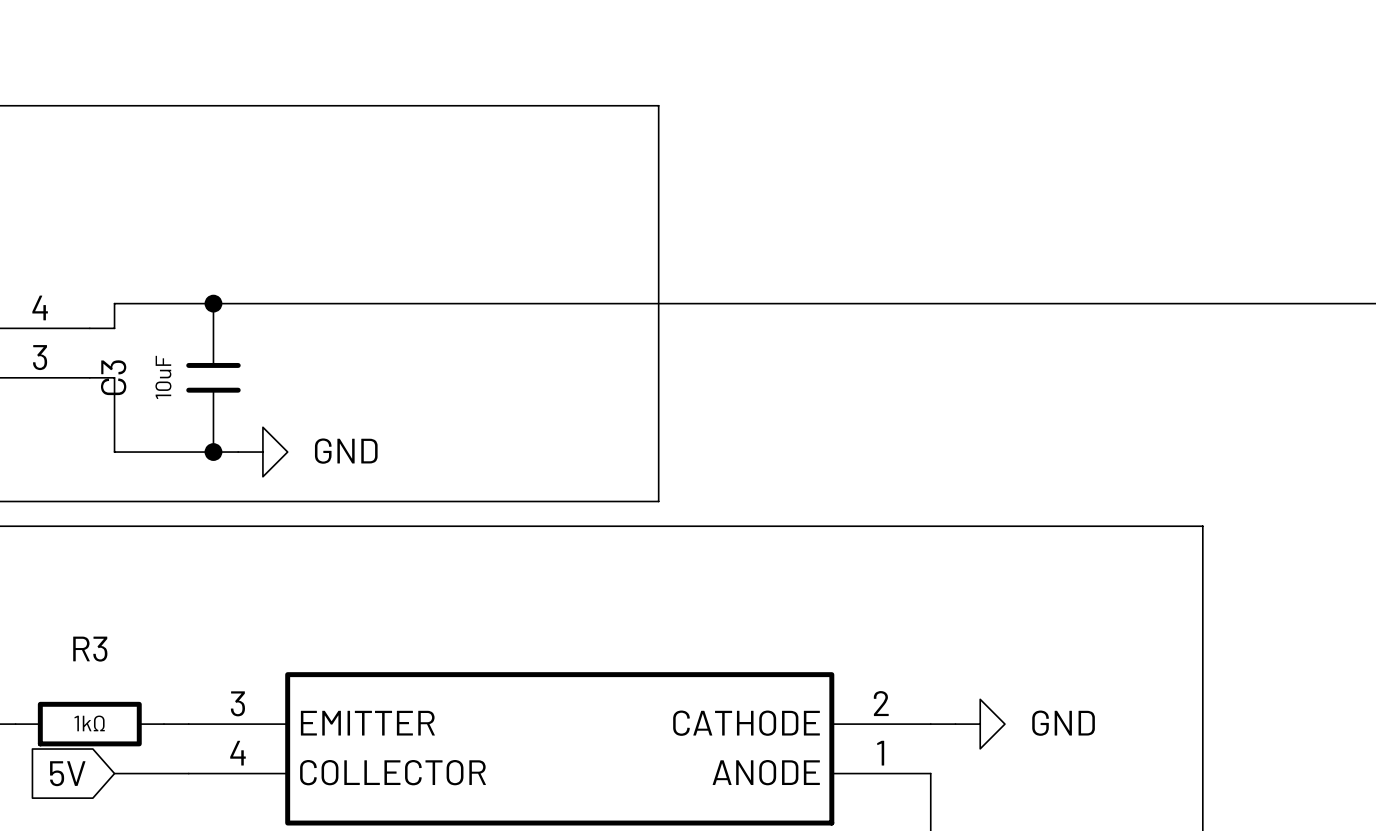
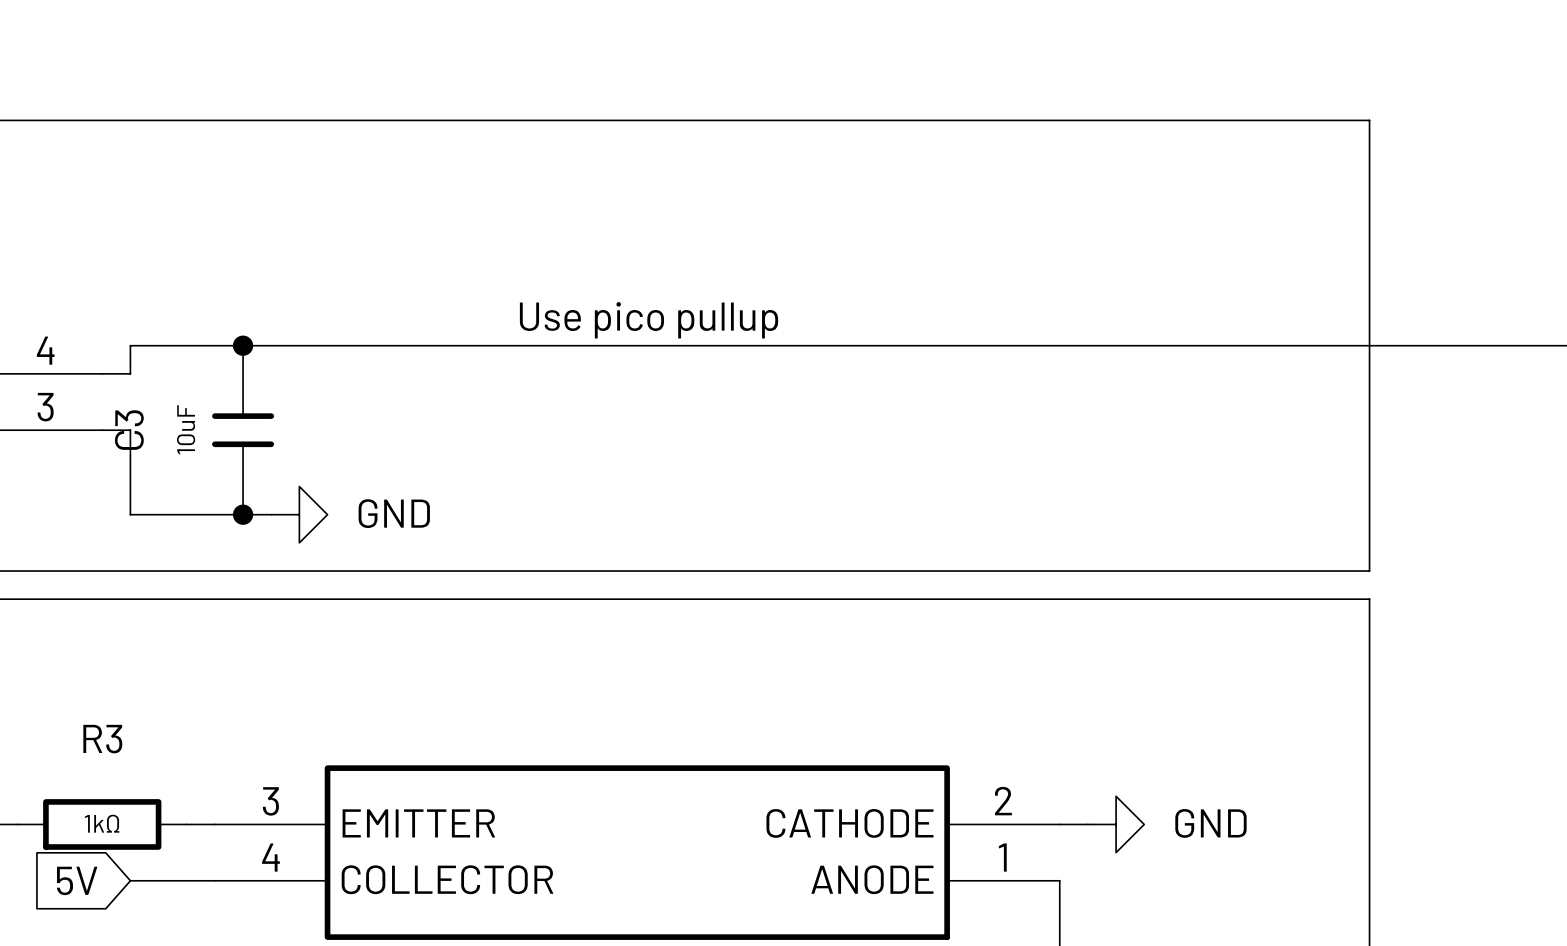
line: (658, 105) (658, 501) -> (749, 120) (1369, 120) (1369, 571) (749, 571)
text: none -> Use pico pullup (649, 320)

